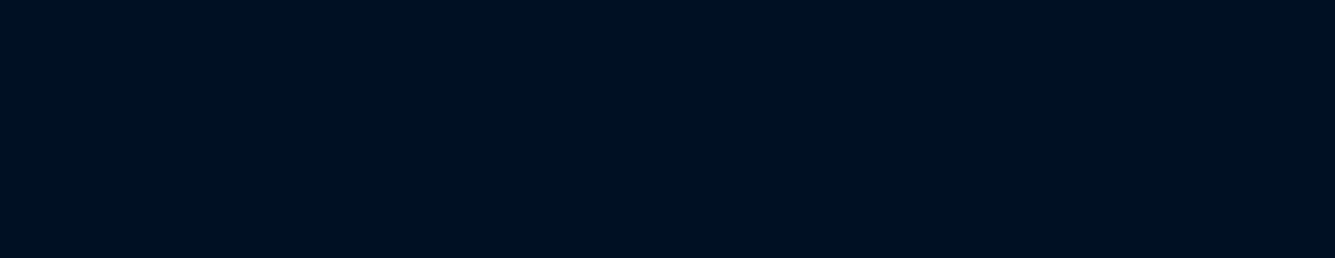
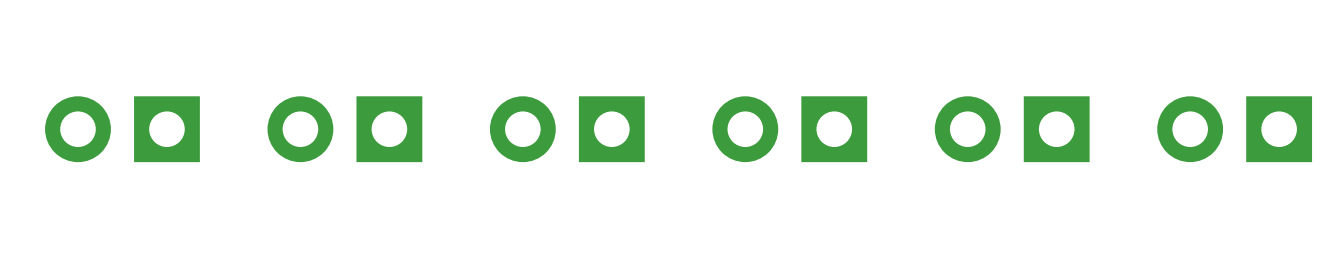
part: none -> (122, 129)
part: none -> (344, 129)
part: none -> (567, 129)
part: none -> (789, 129)
part: none -> (1012, 129)
part: none -> (1234, 129)

